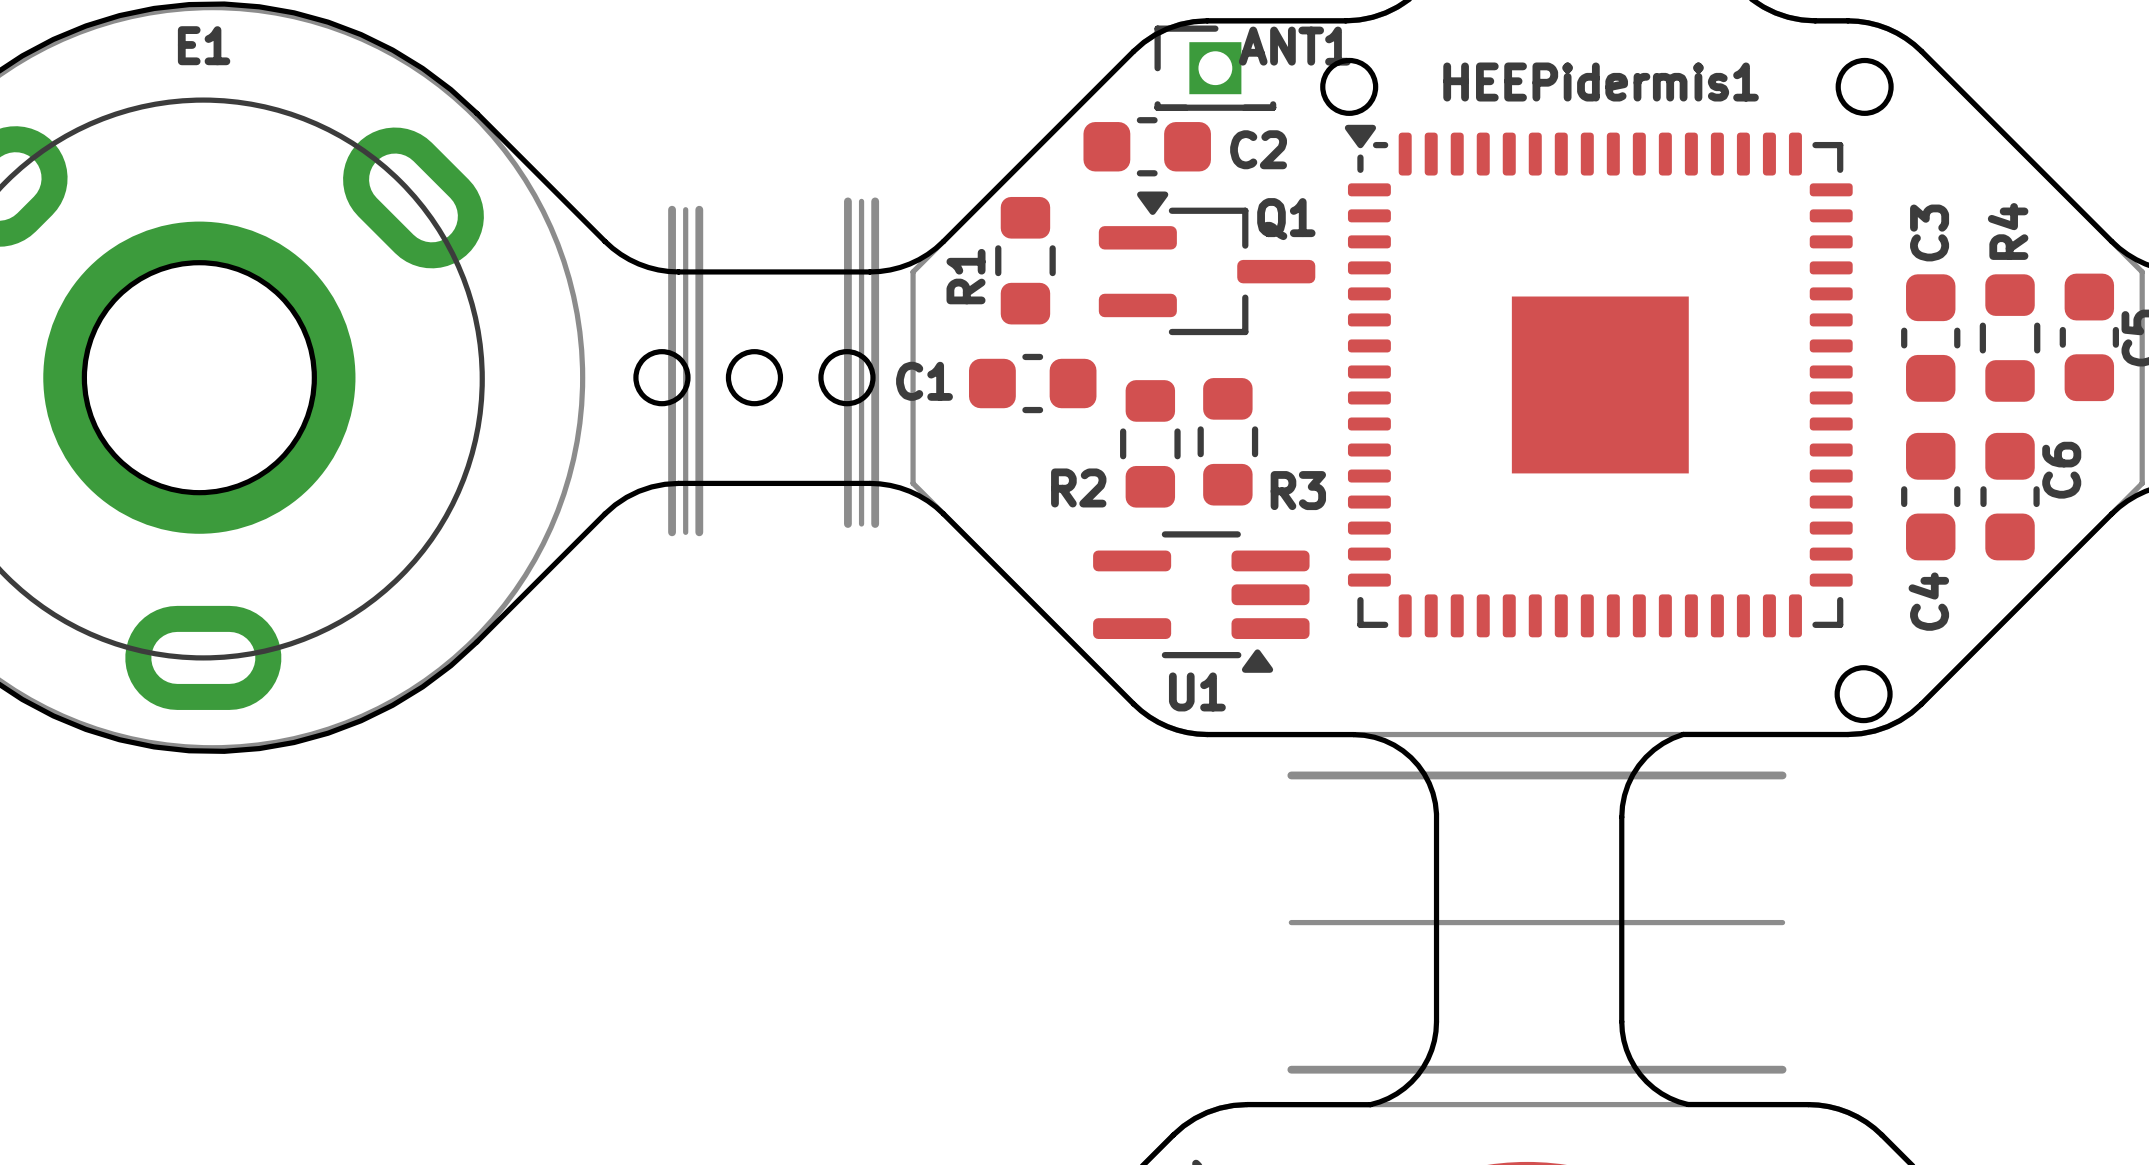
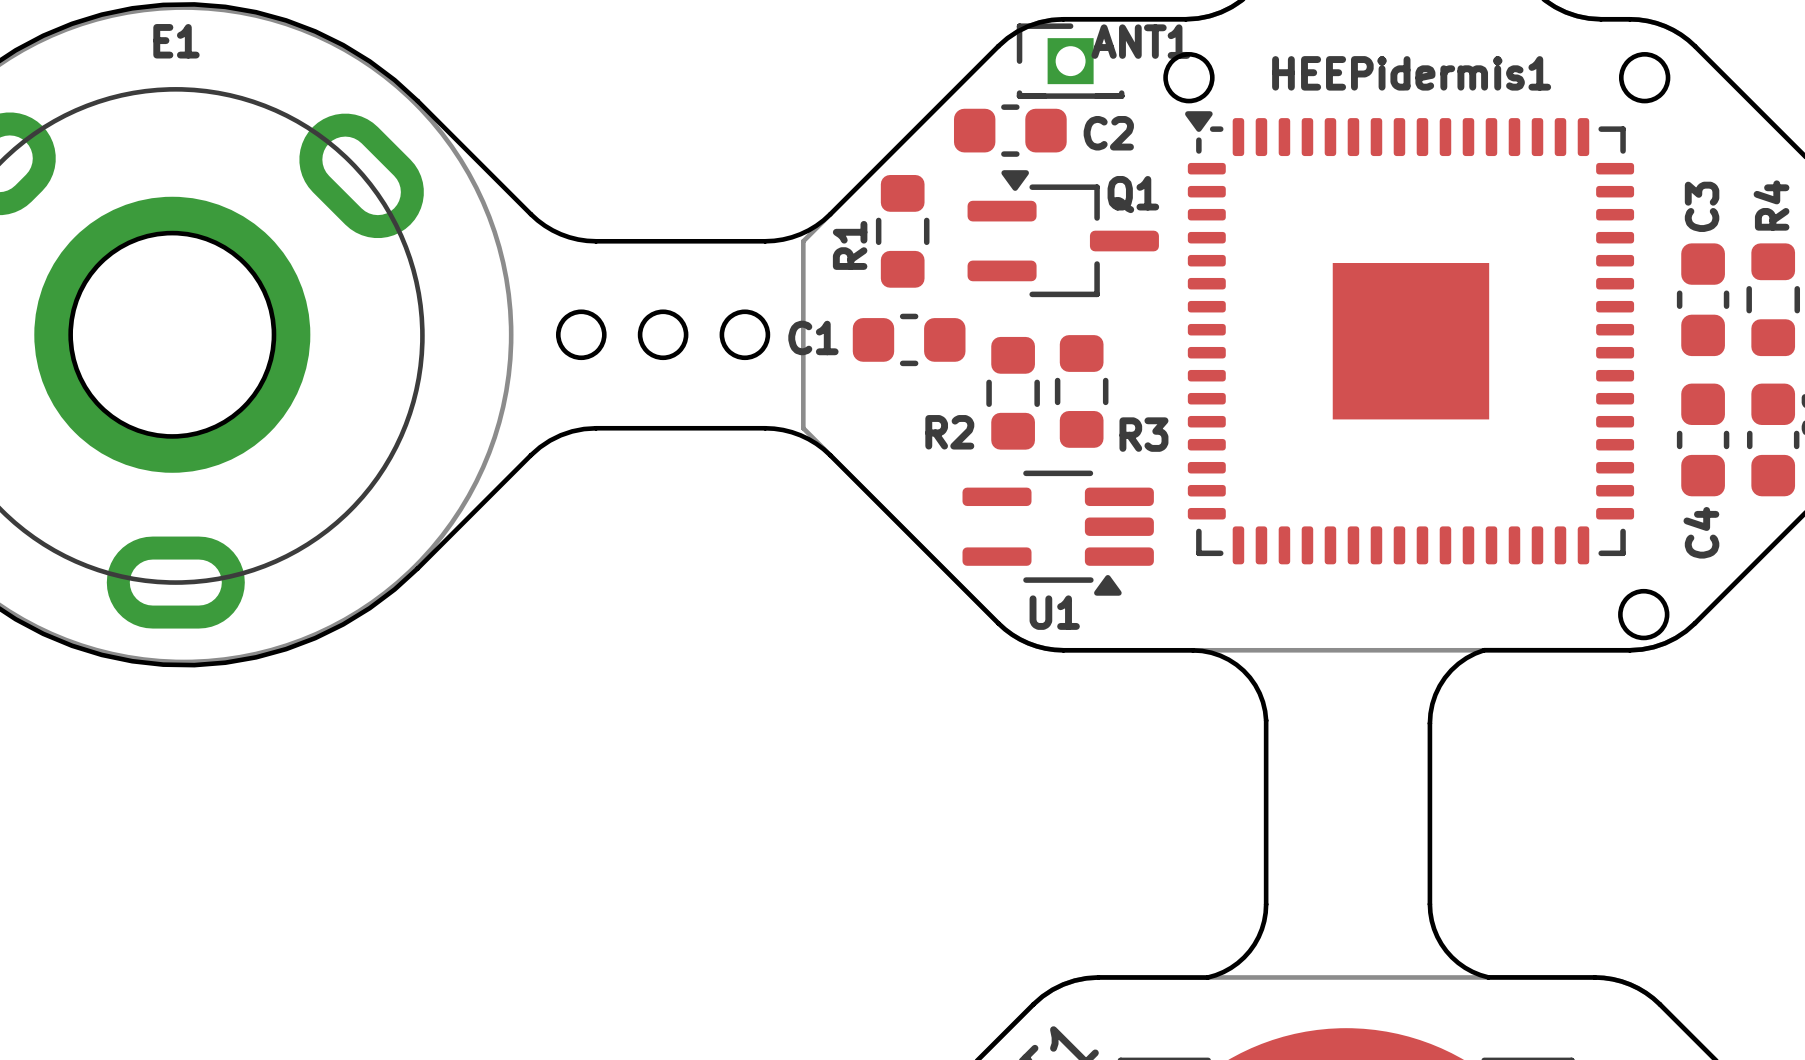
line: (847, 201) (847, 524) -> none
line: (861, 201) (861, 524) -> none
line: (875, 201) (875, 524) -> none
line: (672, 209) (672, 532) -> none
line: (685, 209) (685, 532) -> none
line: (699, 209) (699, 532) -> none
line: (1291, 775) (1782, 775) -> none
line: (1291, 922) (1782, 922) -> none
line: (1291, 1069) (1782, 1069) -> none

